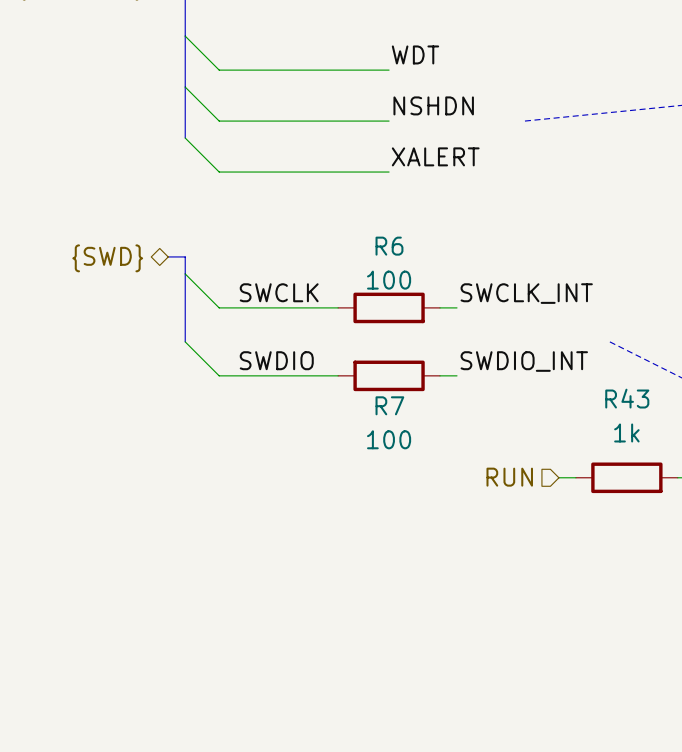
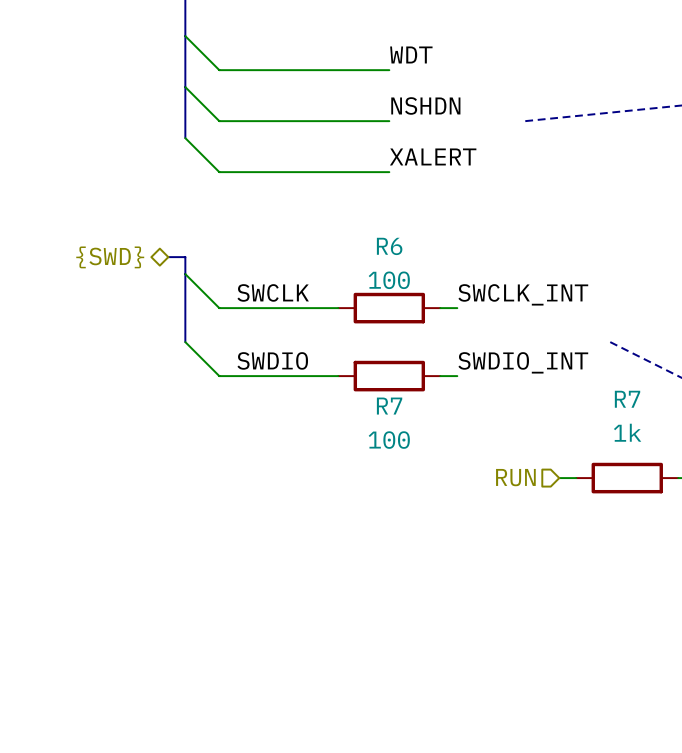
R43 name: R43 (627, 398) -> R7 (627, 399)

